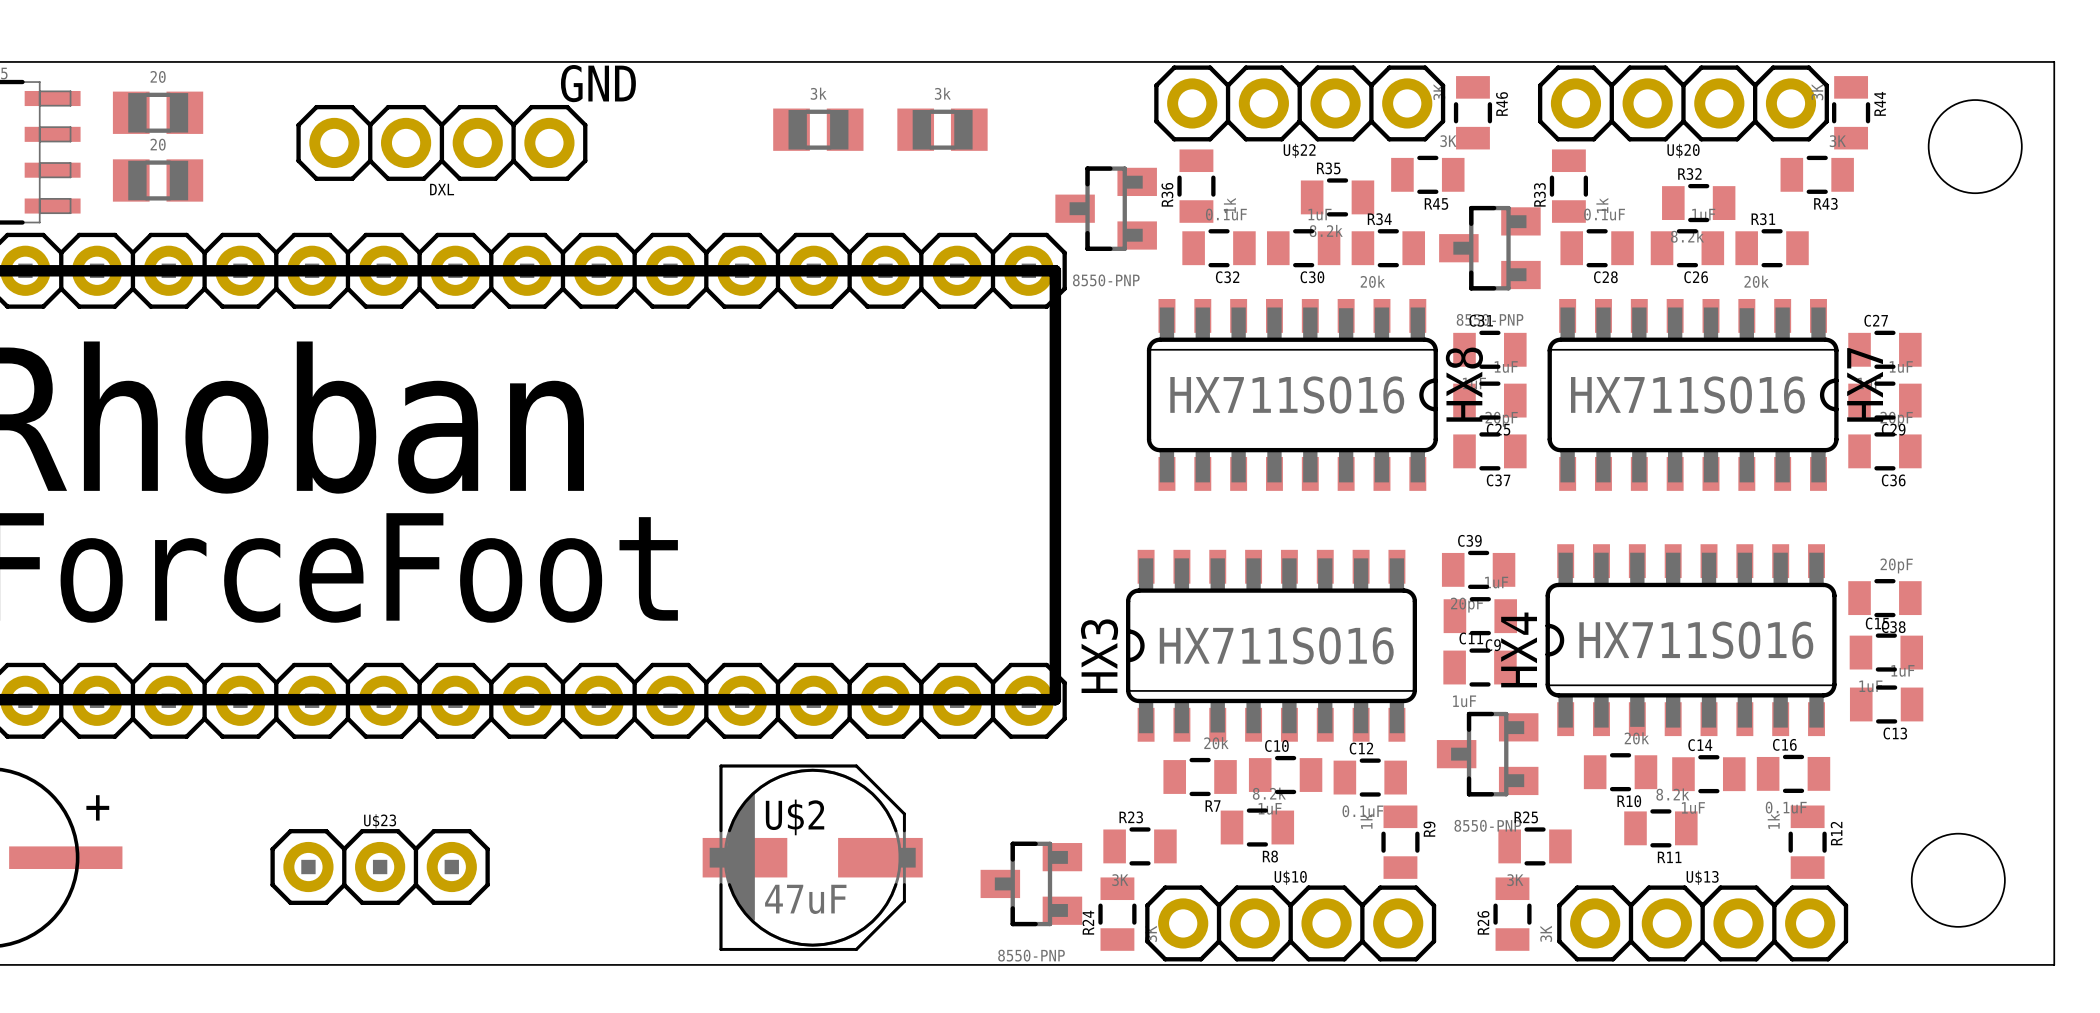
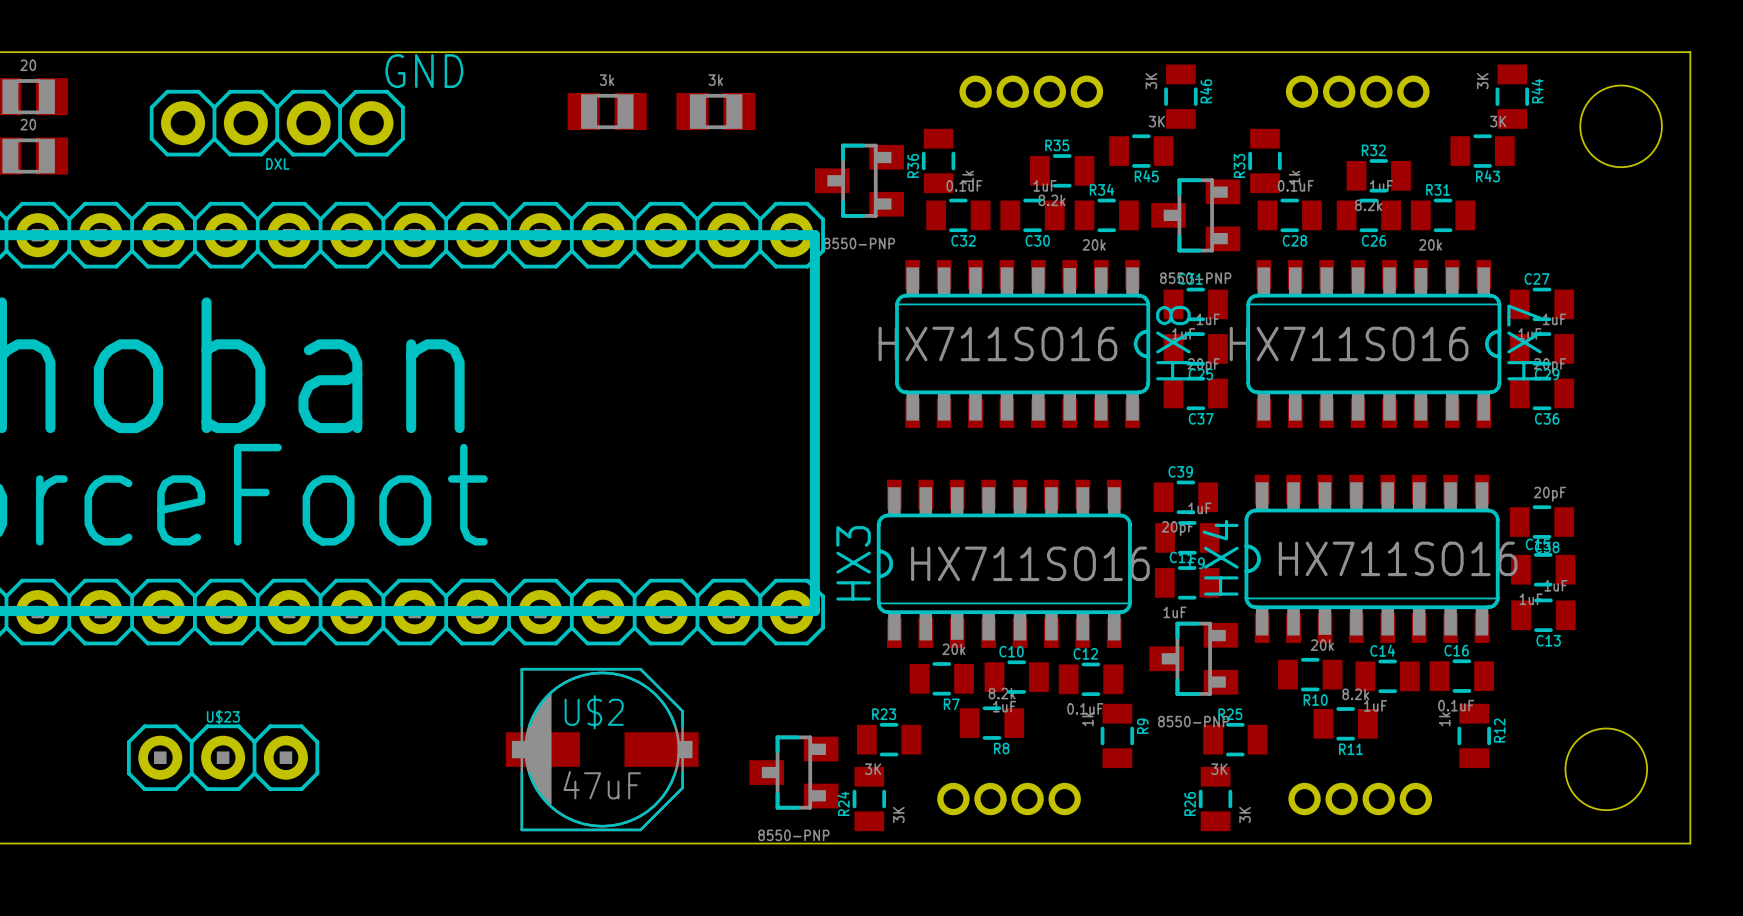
U$22: (1299, 103) -> none
U$20: (1683, 103) -> none
part: none -> (1031, 91)
part: none -> (1357, 91)
part: none -> (1009, 799)
part: none -> (1360, 799)
U$10: (1290, 923) -> none
U$13: (1702, 923) -> none

